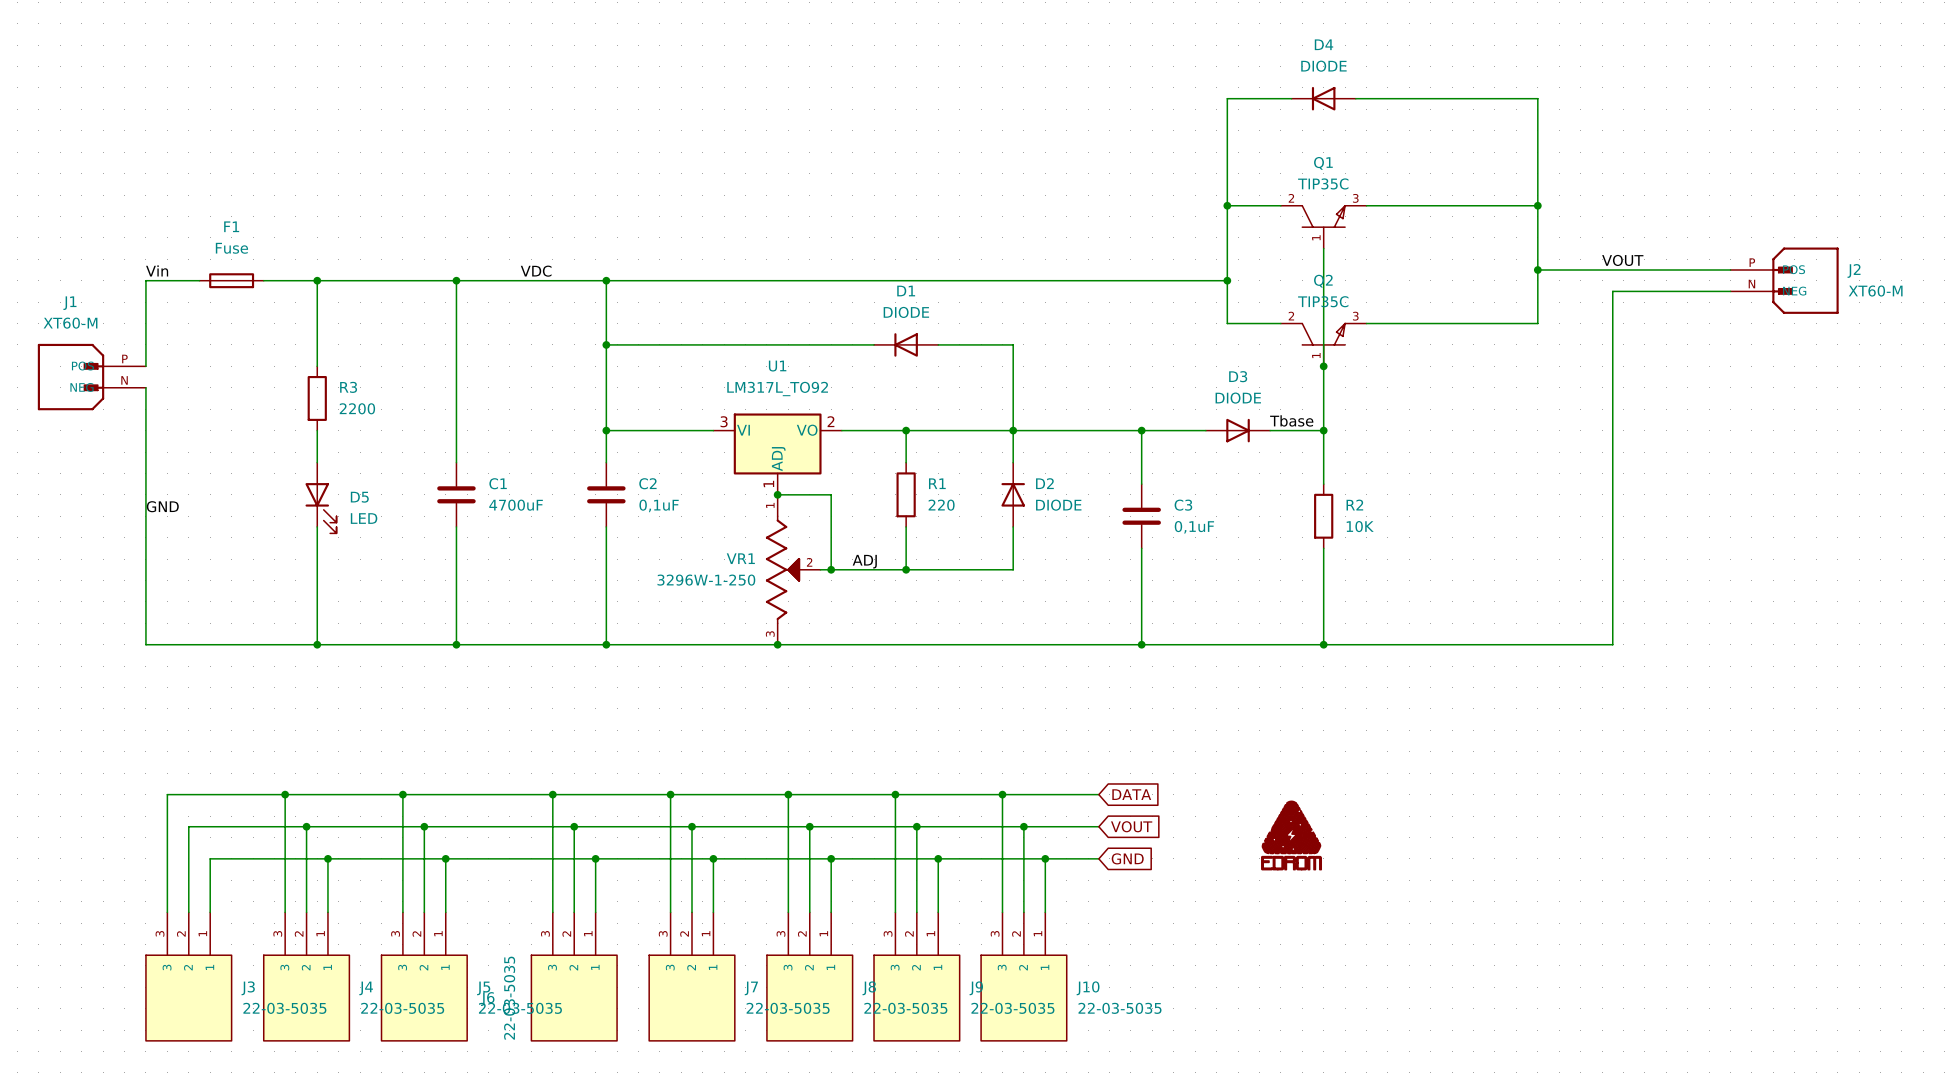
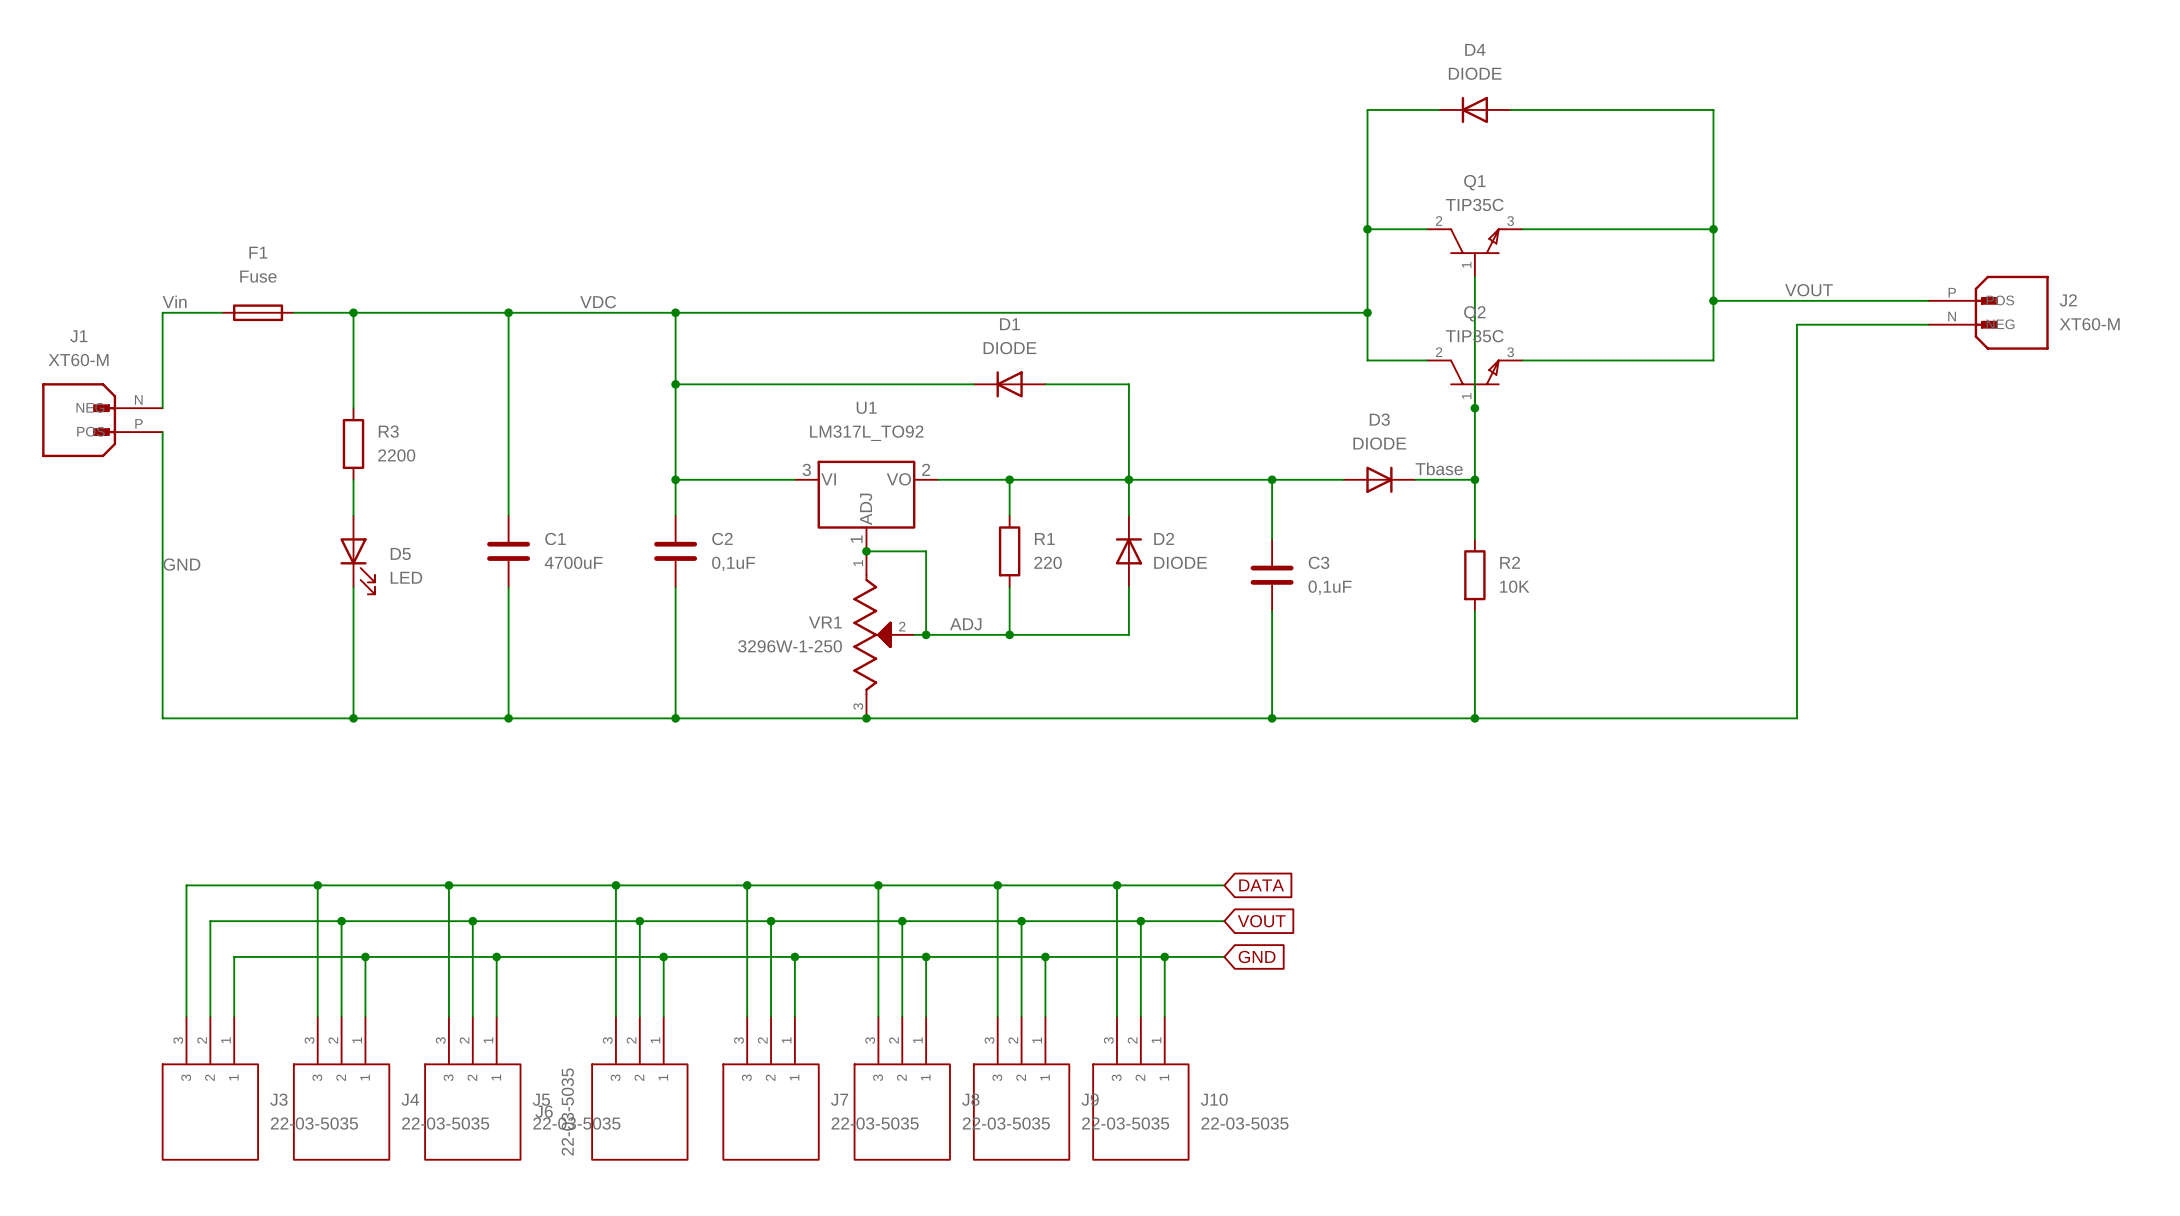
J1 flip: as is (71, 377) -> up-down (79, 420)
power symbol: (1291, 835) -> none

